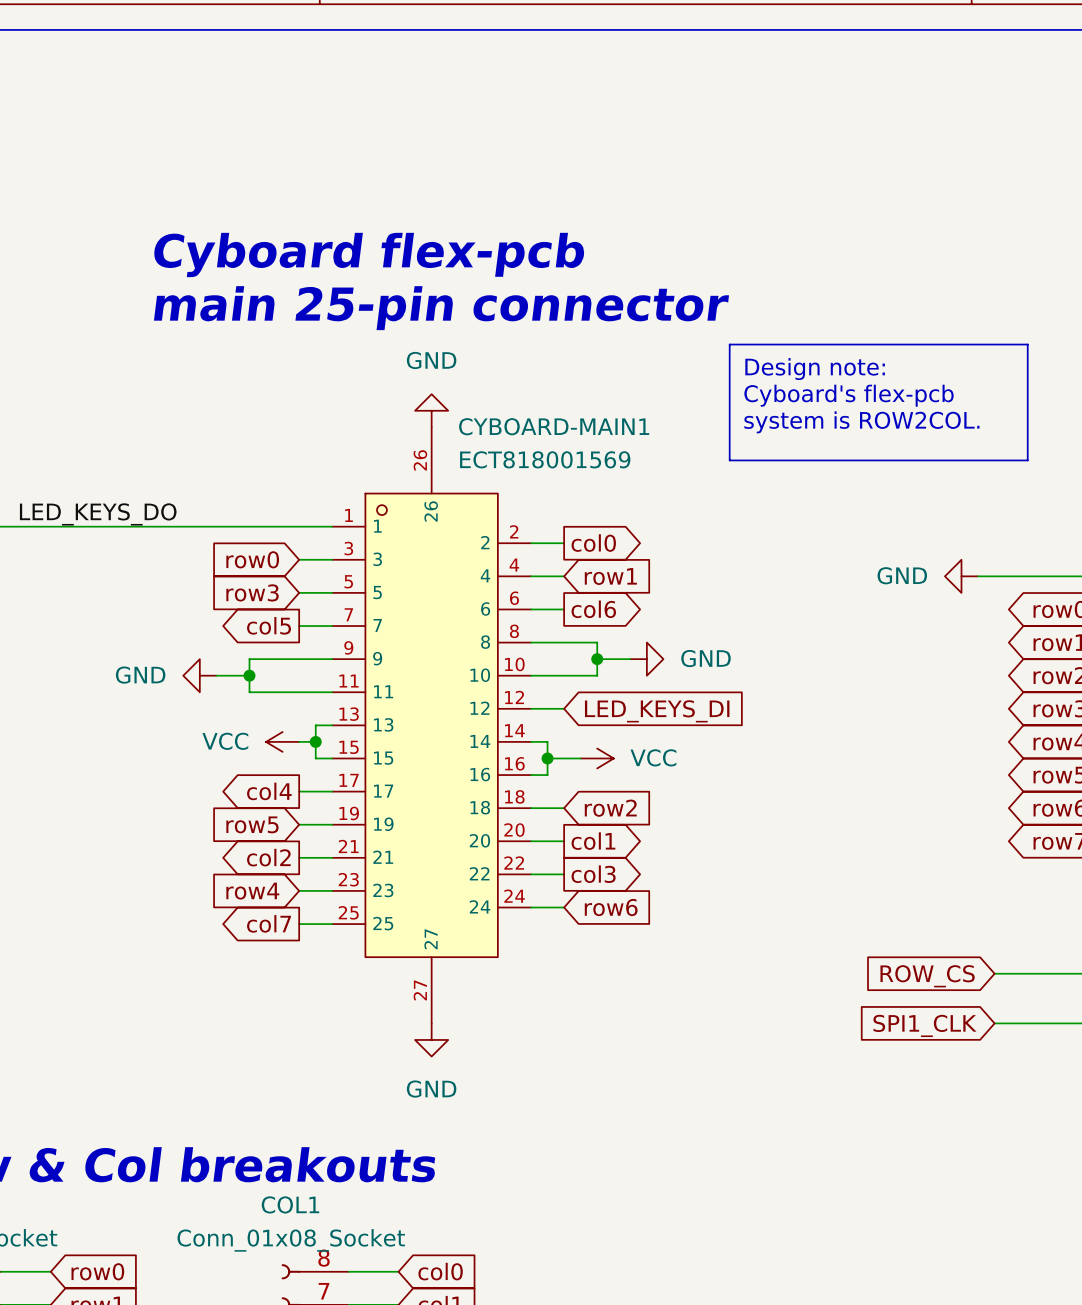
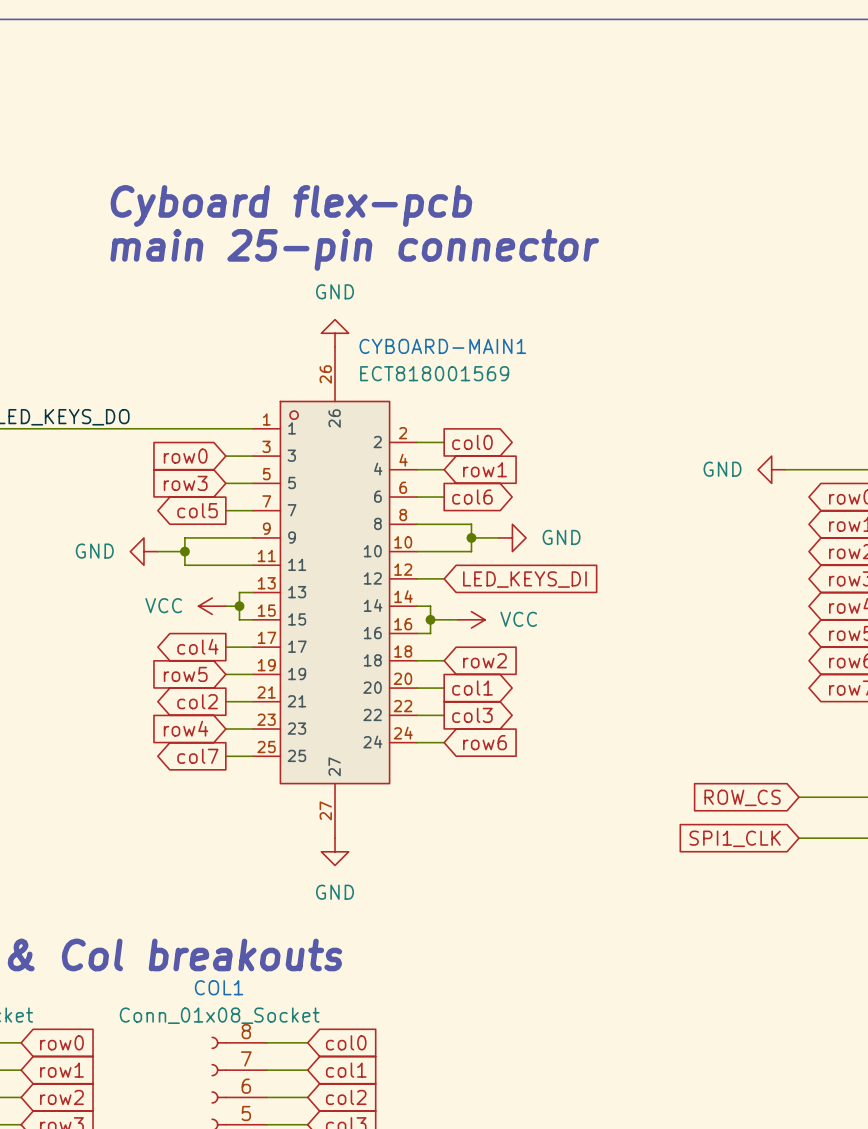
line: (729, 344) (1027, 344) (1027, 460) (729, 460) (729, 344) -> none
text: Design note: (815, 369) -> none
text: Cyboard's flex-pcb (849, 395) -> none
text: system is ROW2COL. (861, 422) -> none

